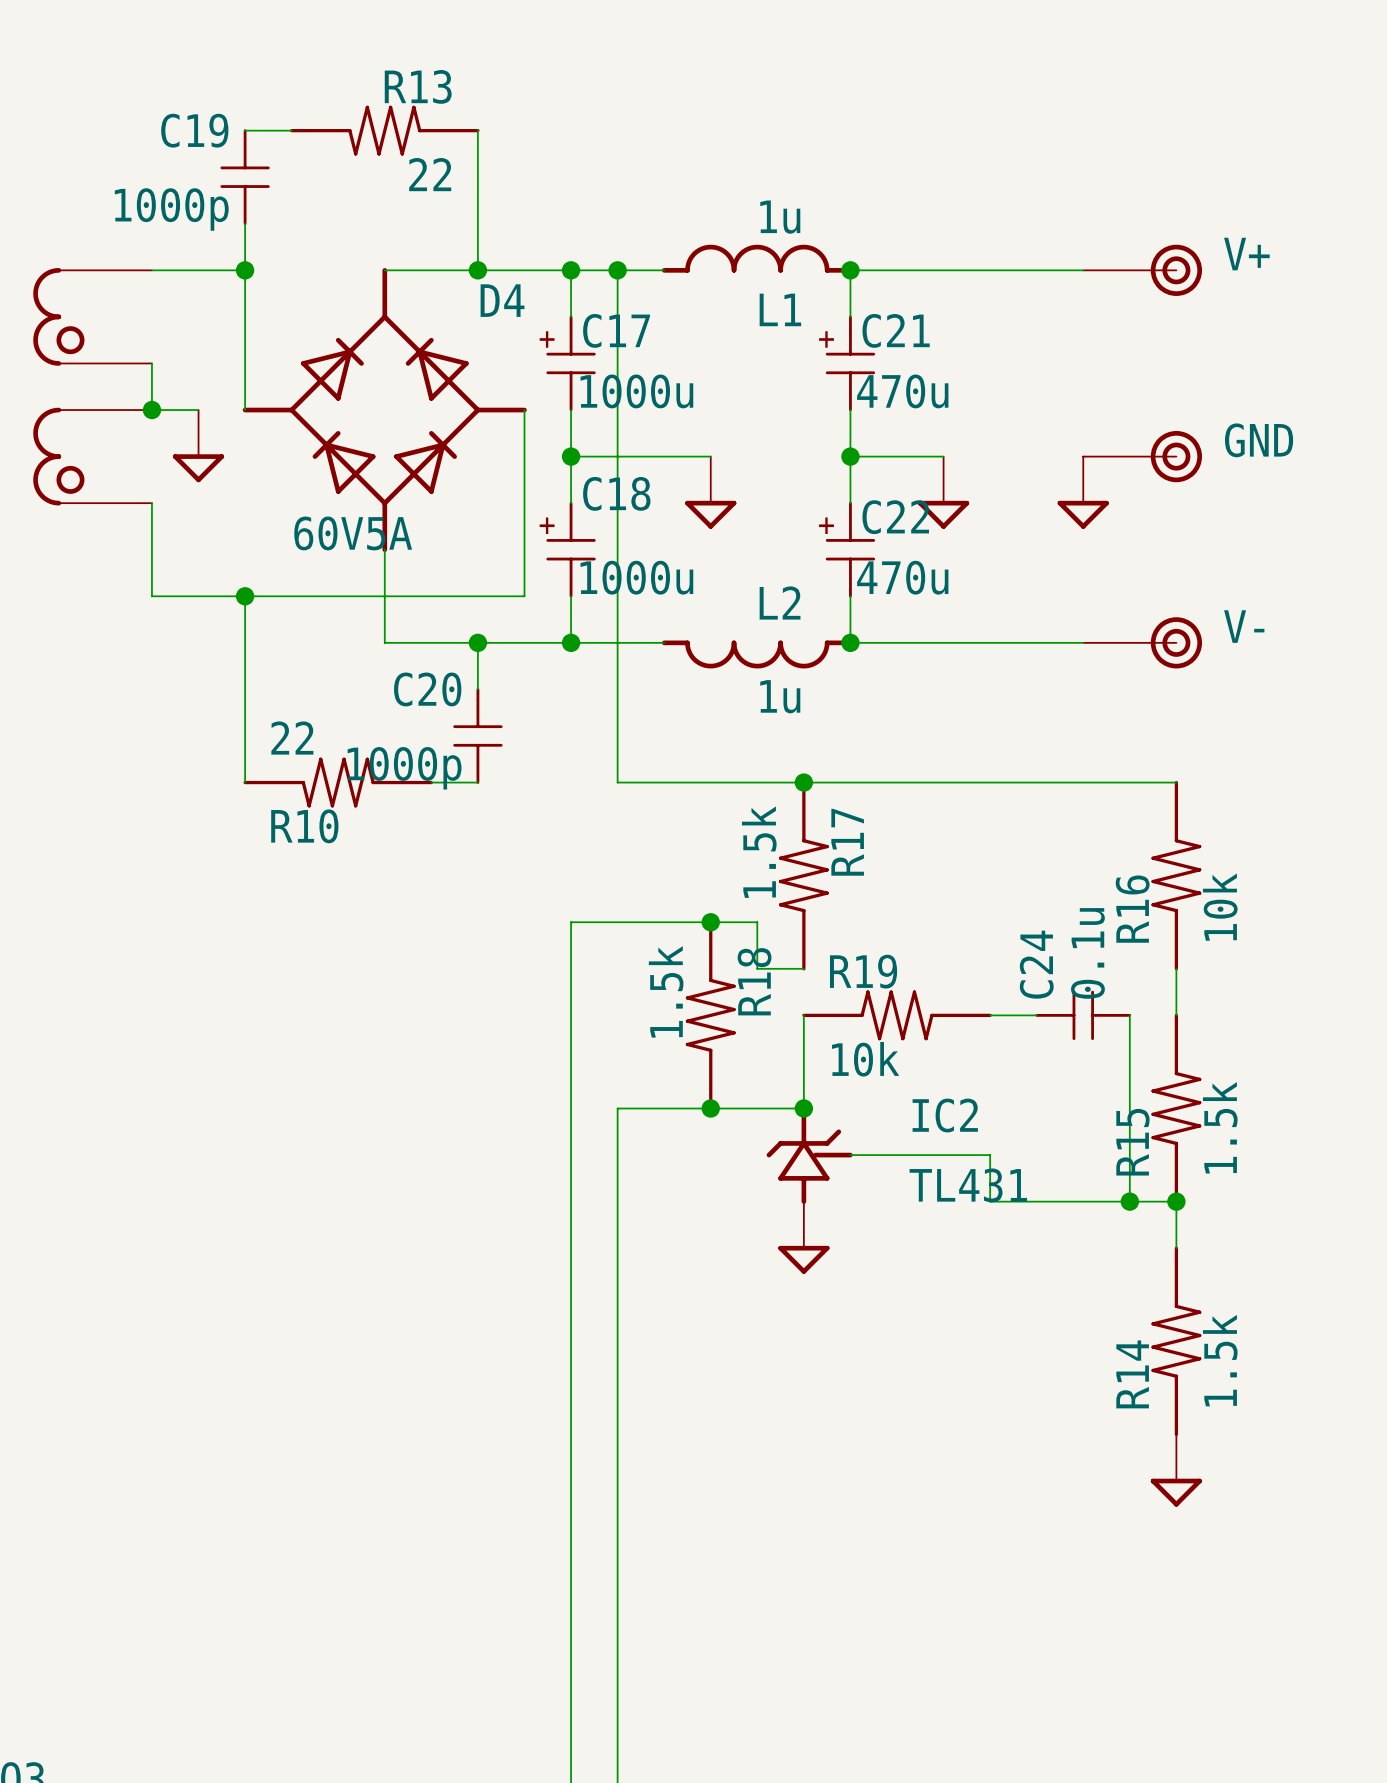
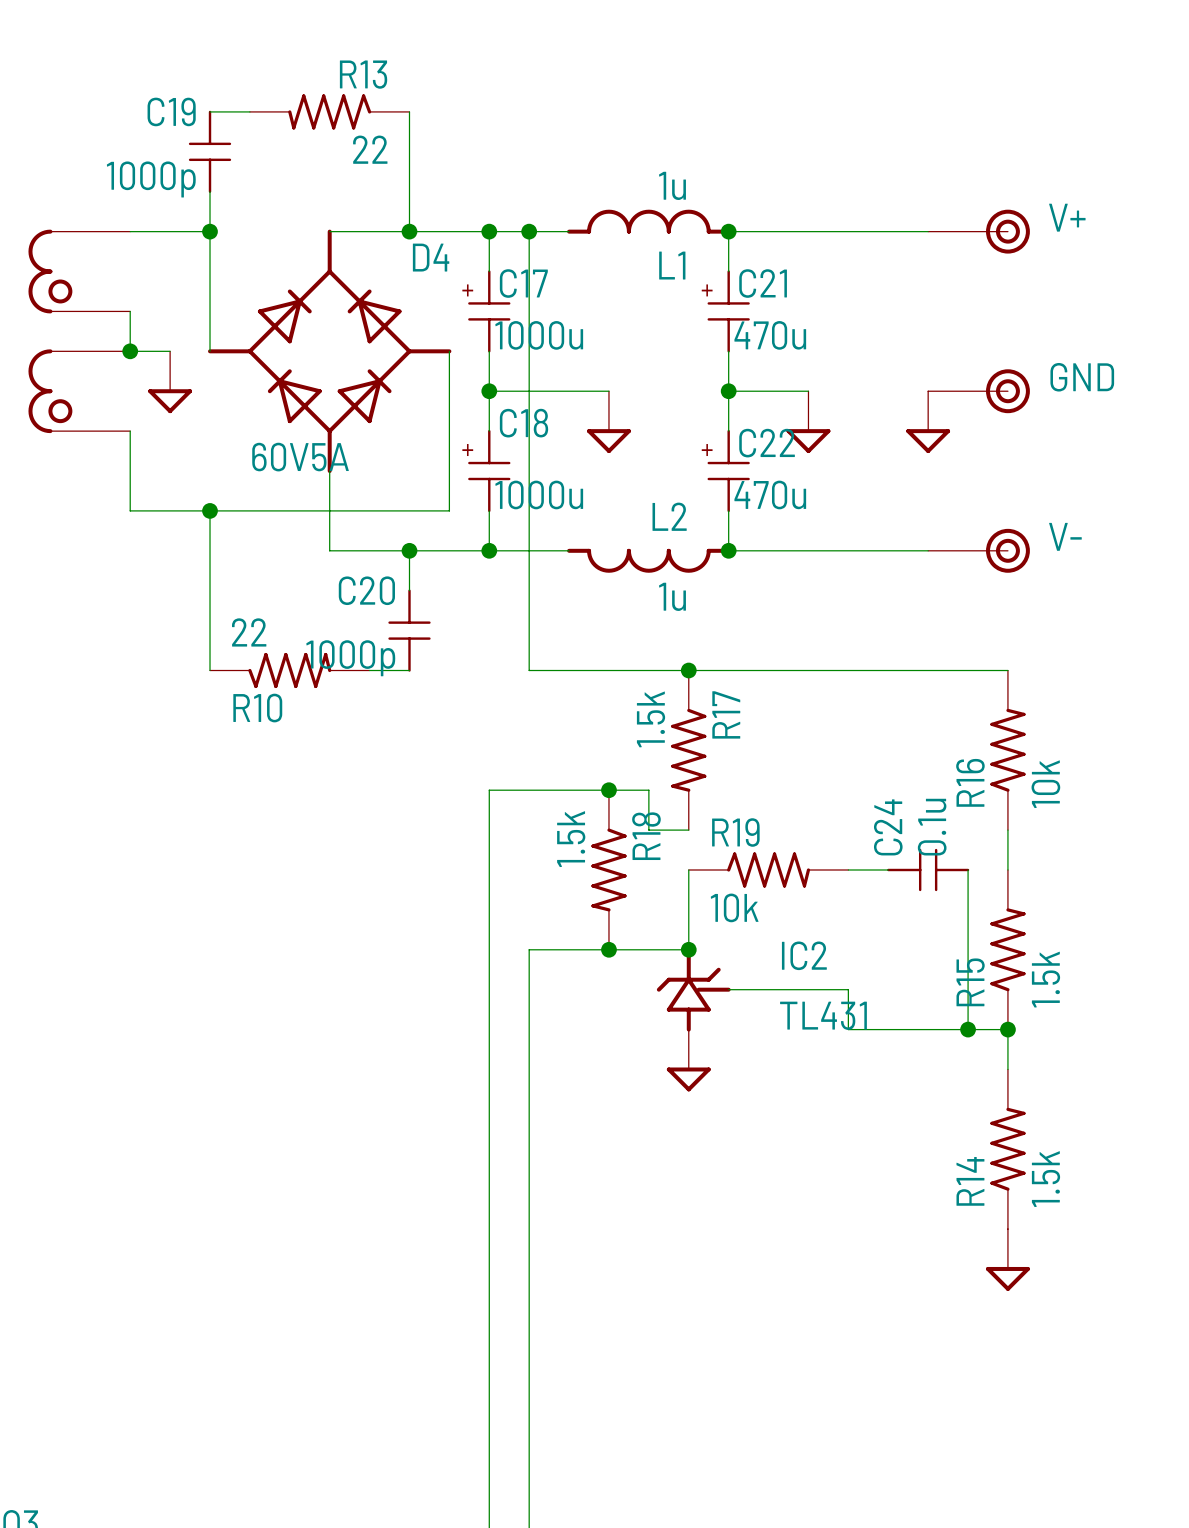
R13 symbol: [290, 105, 480, 156] -> [249, 94, 410, 130]
R10 symbol: [243, 757, 433, 808] -> [210, 652, 370, 689]
R17 symbol: [778, 780, 829, 971] -> [671, 670, 707, 831]
R16 symbol: [1151, 780, 1202, 971] -> [990, 670, 1026, 831]
R18 symbol: [685, 920, 736, 1111] -> [591, 790, 627, 950]
R19 symbol: [802, 990, 992, 1041] -> [688, 852, 849, 888]
R15 symbol: [1151, 1013, 1202, 1204] -> [990, 869, 1026, 1030]
R14 symbol: [1151, 1246, 1202, 1437] -> [990, 1069, 1026, 1230]

